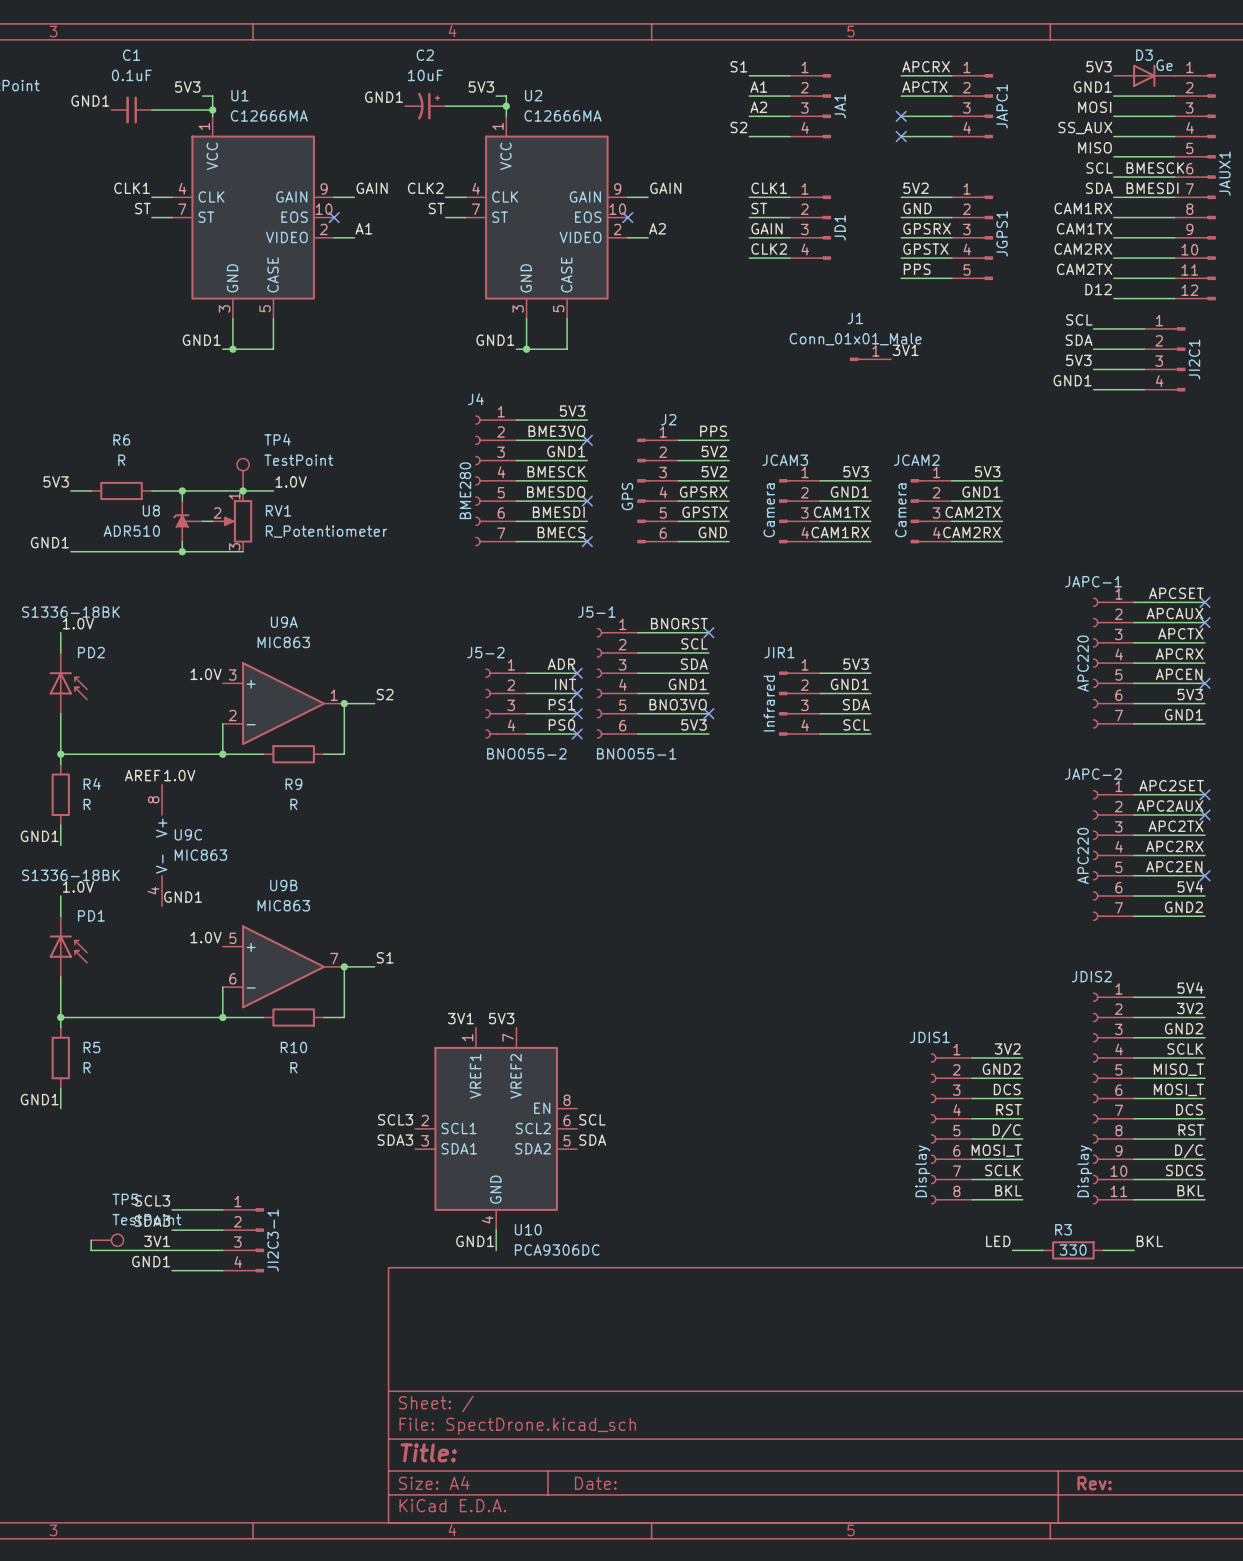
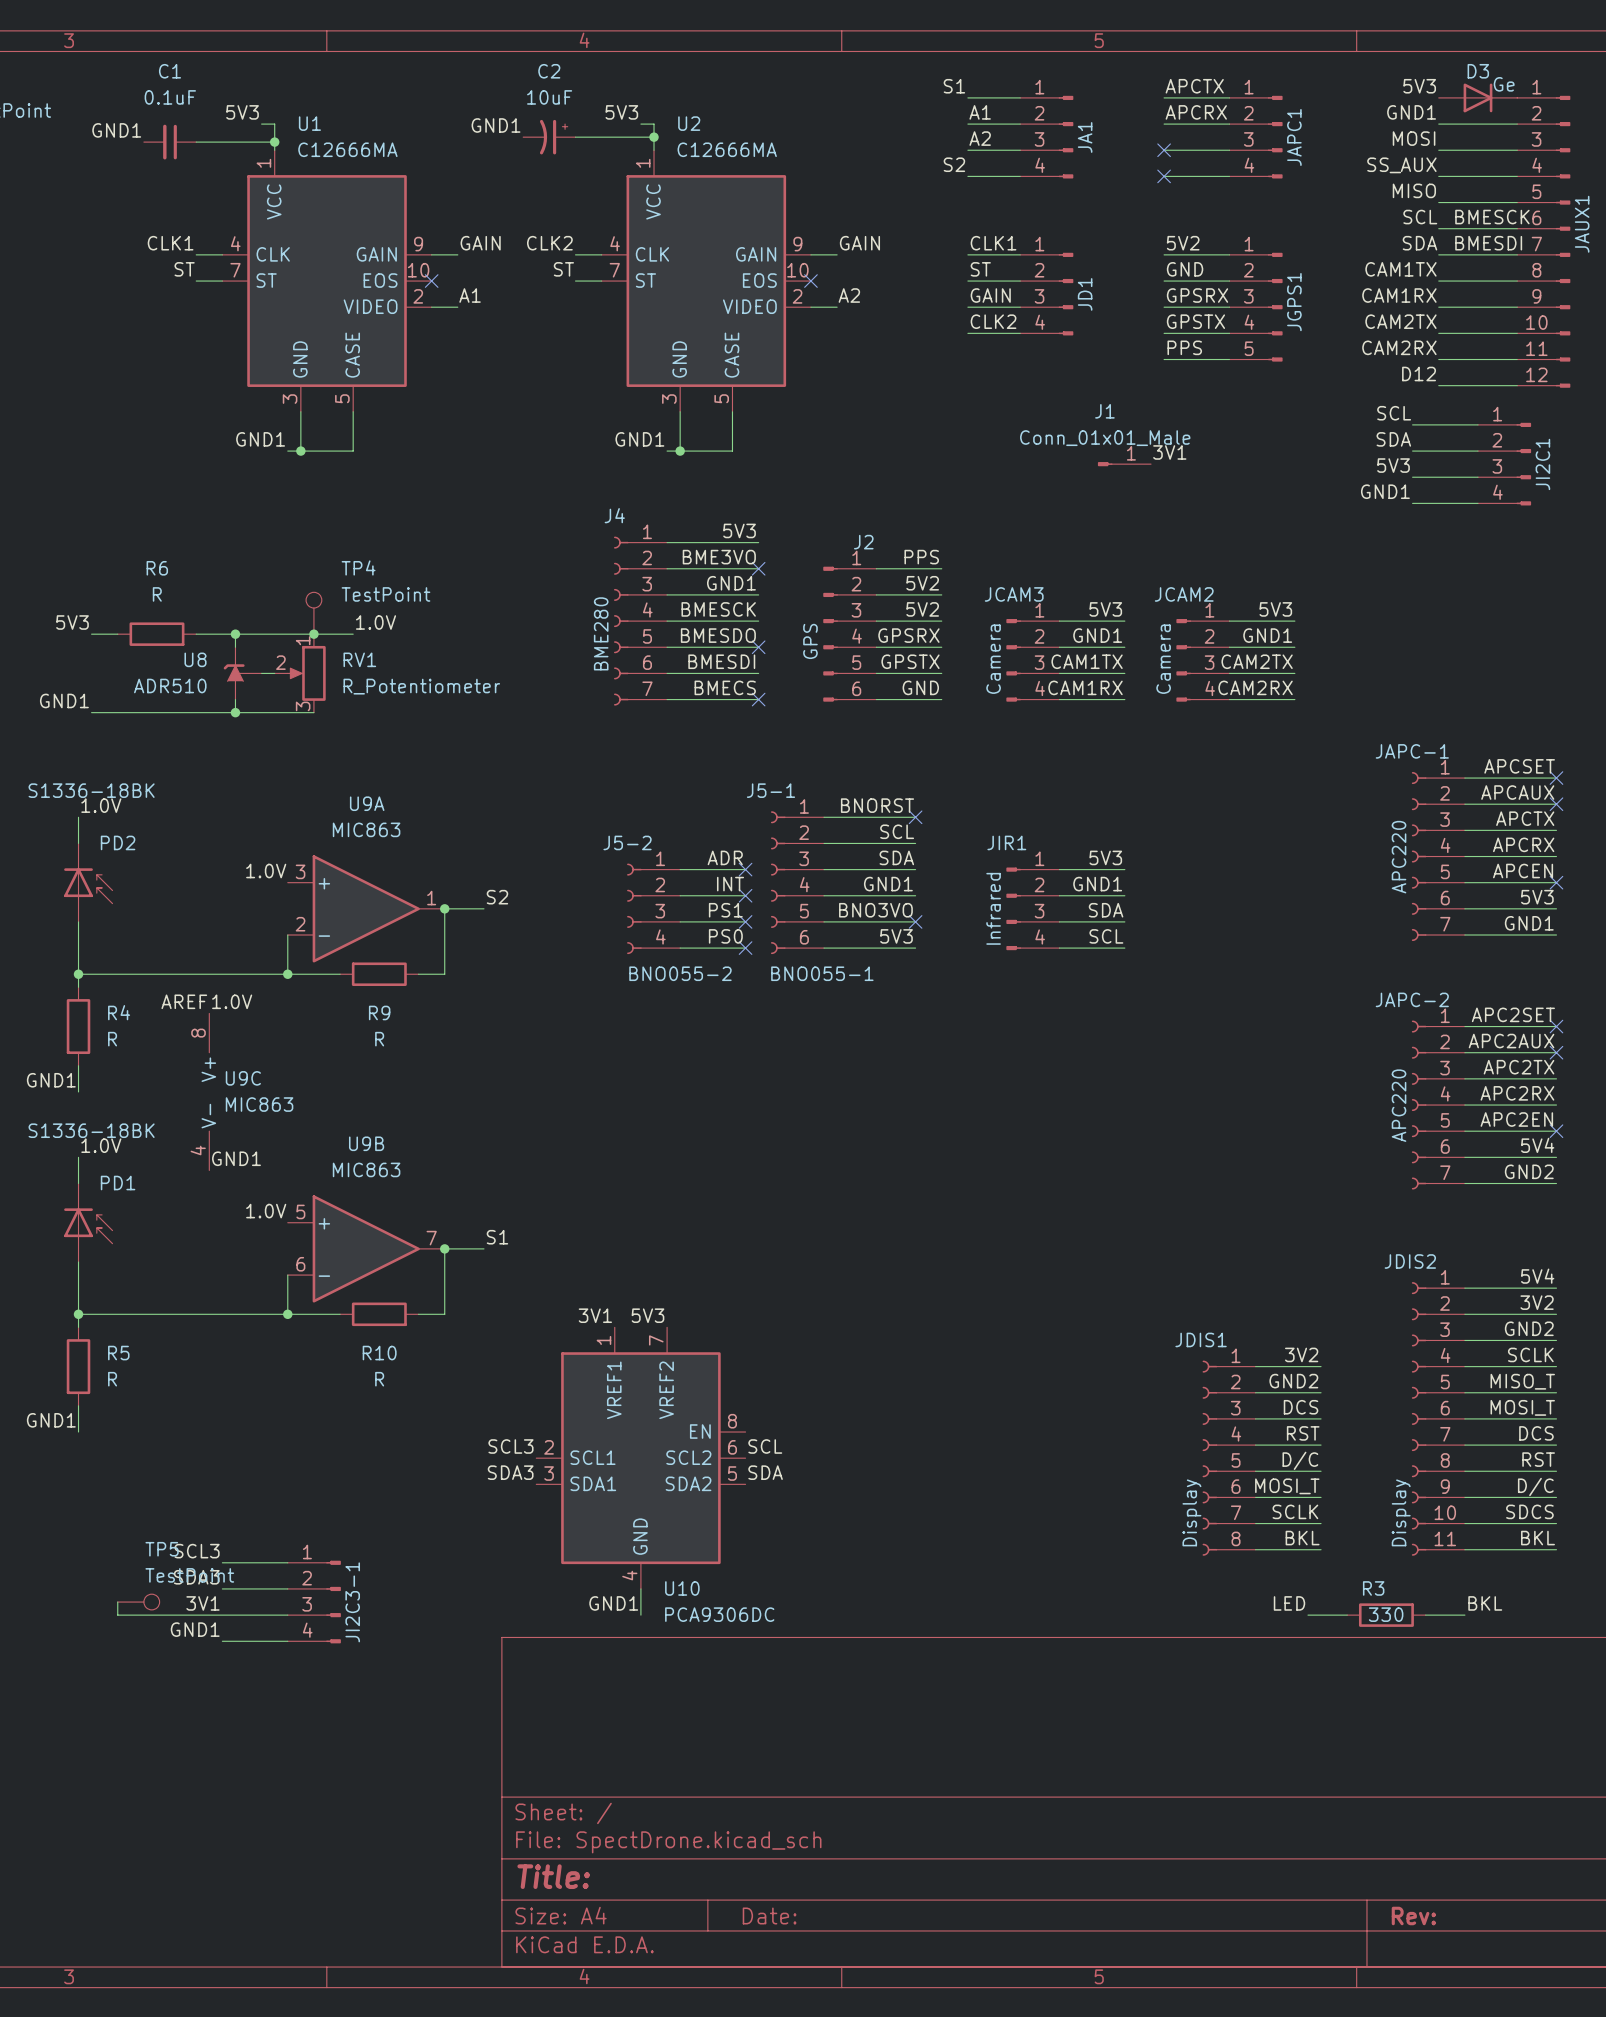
label: APCRX (926, 66) -> APCTX (1194, 86)
label: APCTX (924, 87) -> APCRX (1196, 112)
label: CAM1RX (1083, 208) -> CAM1TX (1400, 269)
label: CAM1TX (1084, 228) -> CAM1RX (1399, 295)
label: CAM2RX (1083, 249) -> CAM2TX (1400, 321)
label: CAM2TX (1084, 269) -> CAM2RX (1399, 347)

